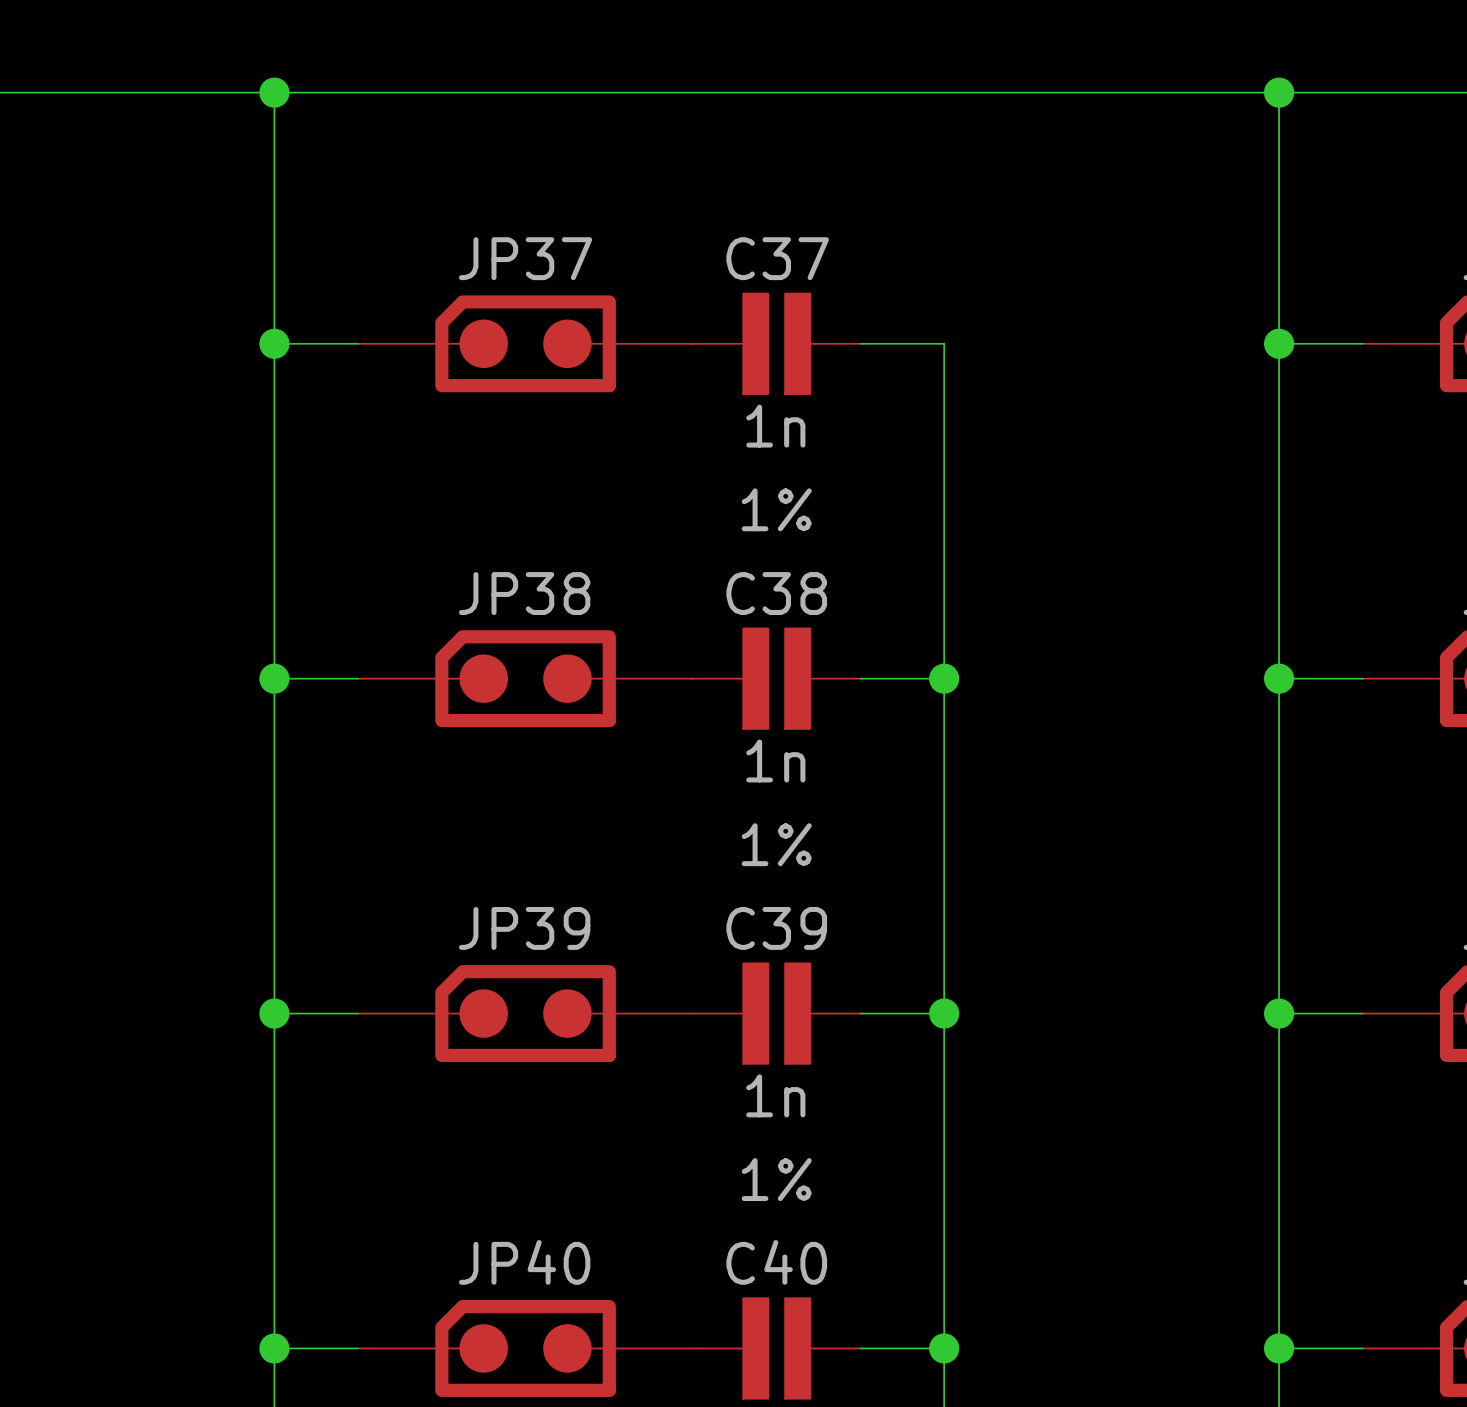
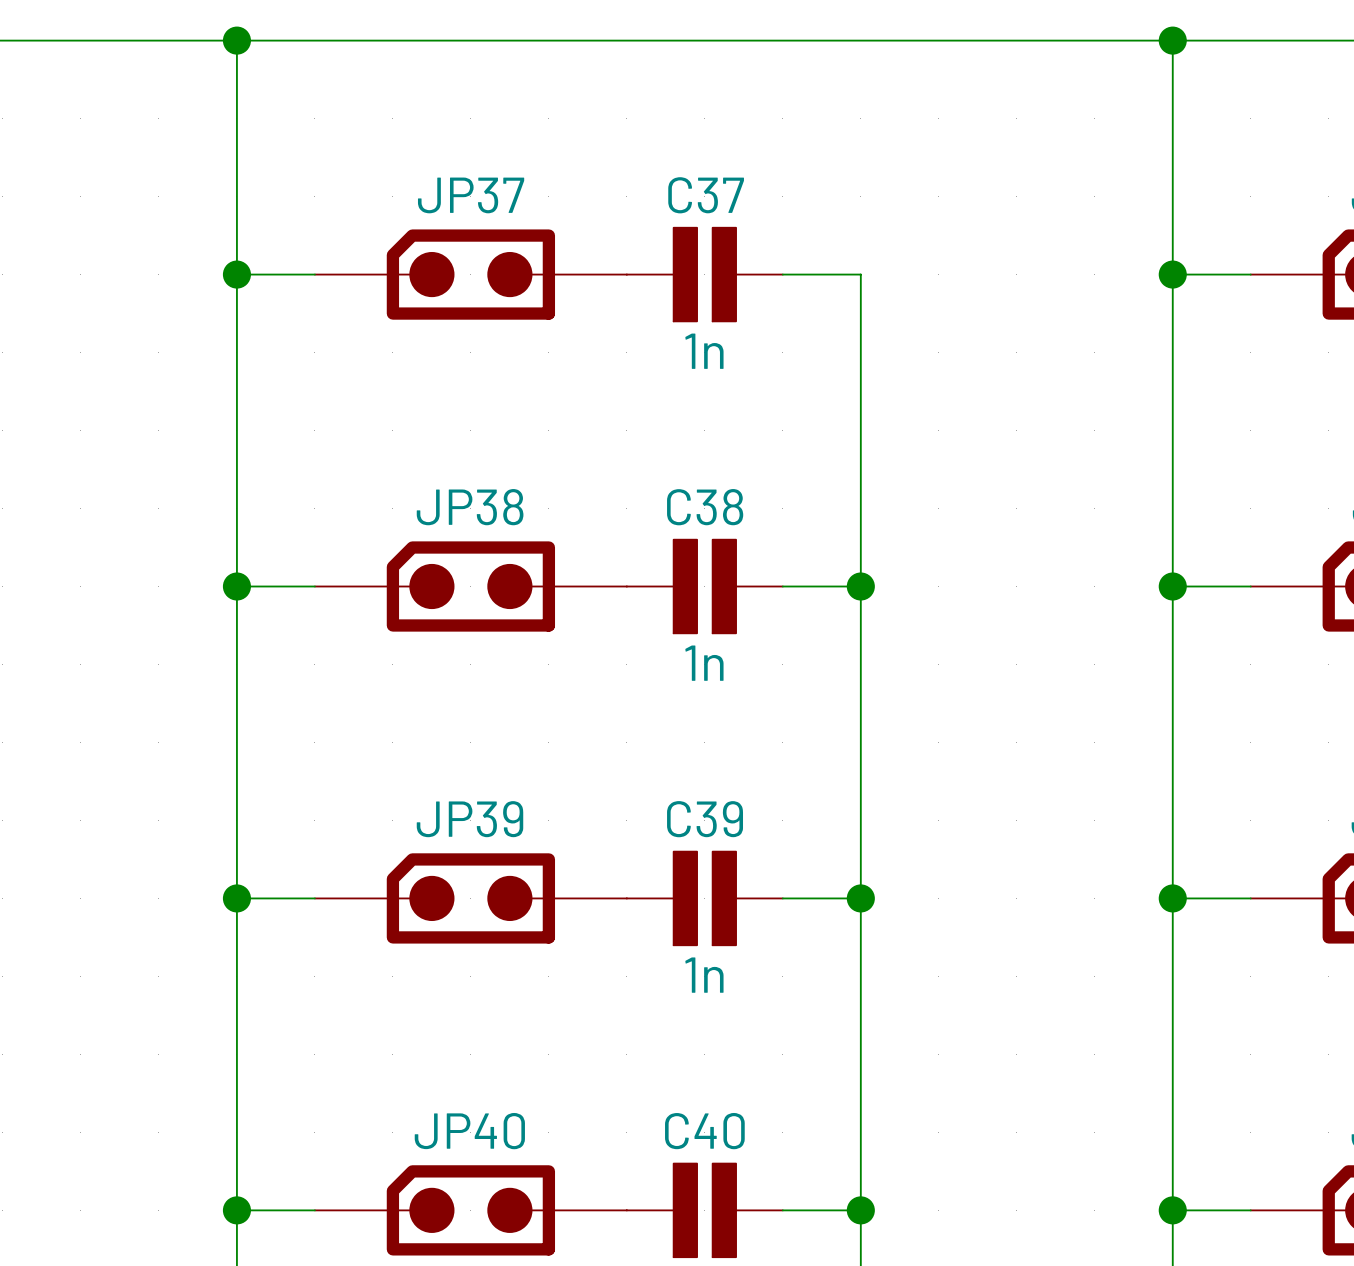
C37 text: 1% (776, 509) -> none
C38 text: 1% (776, 844) -> none
C39 text: 1% (776, 1179) -> none

